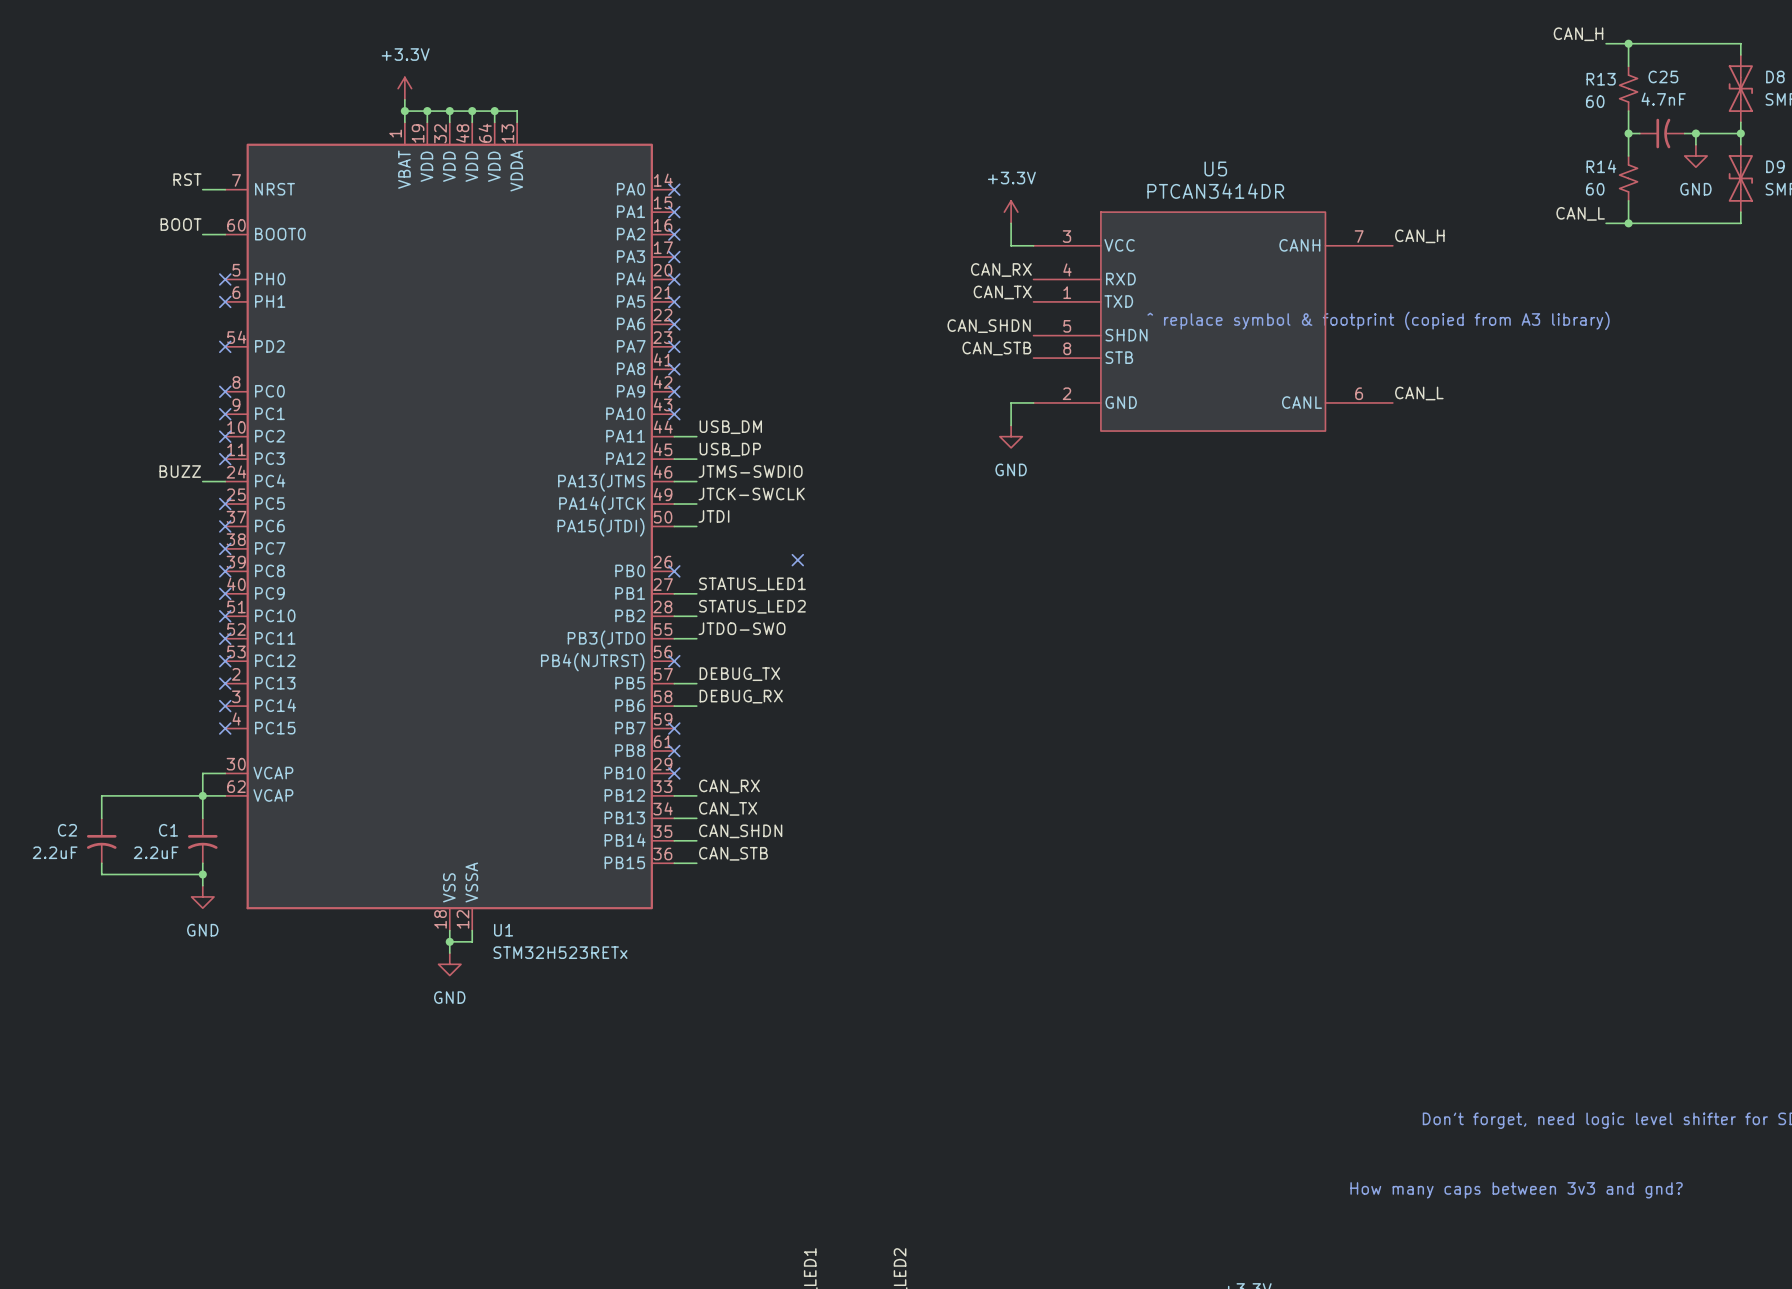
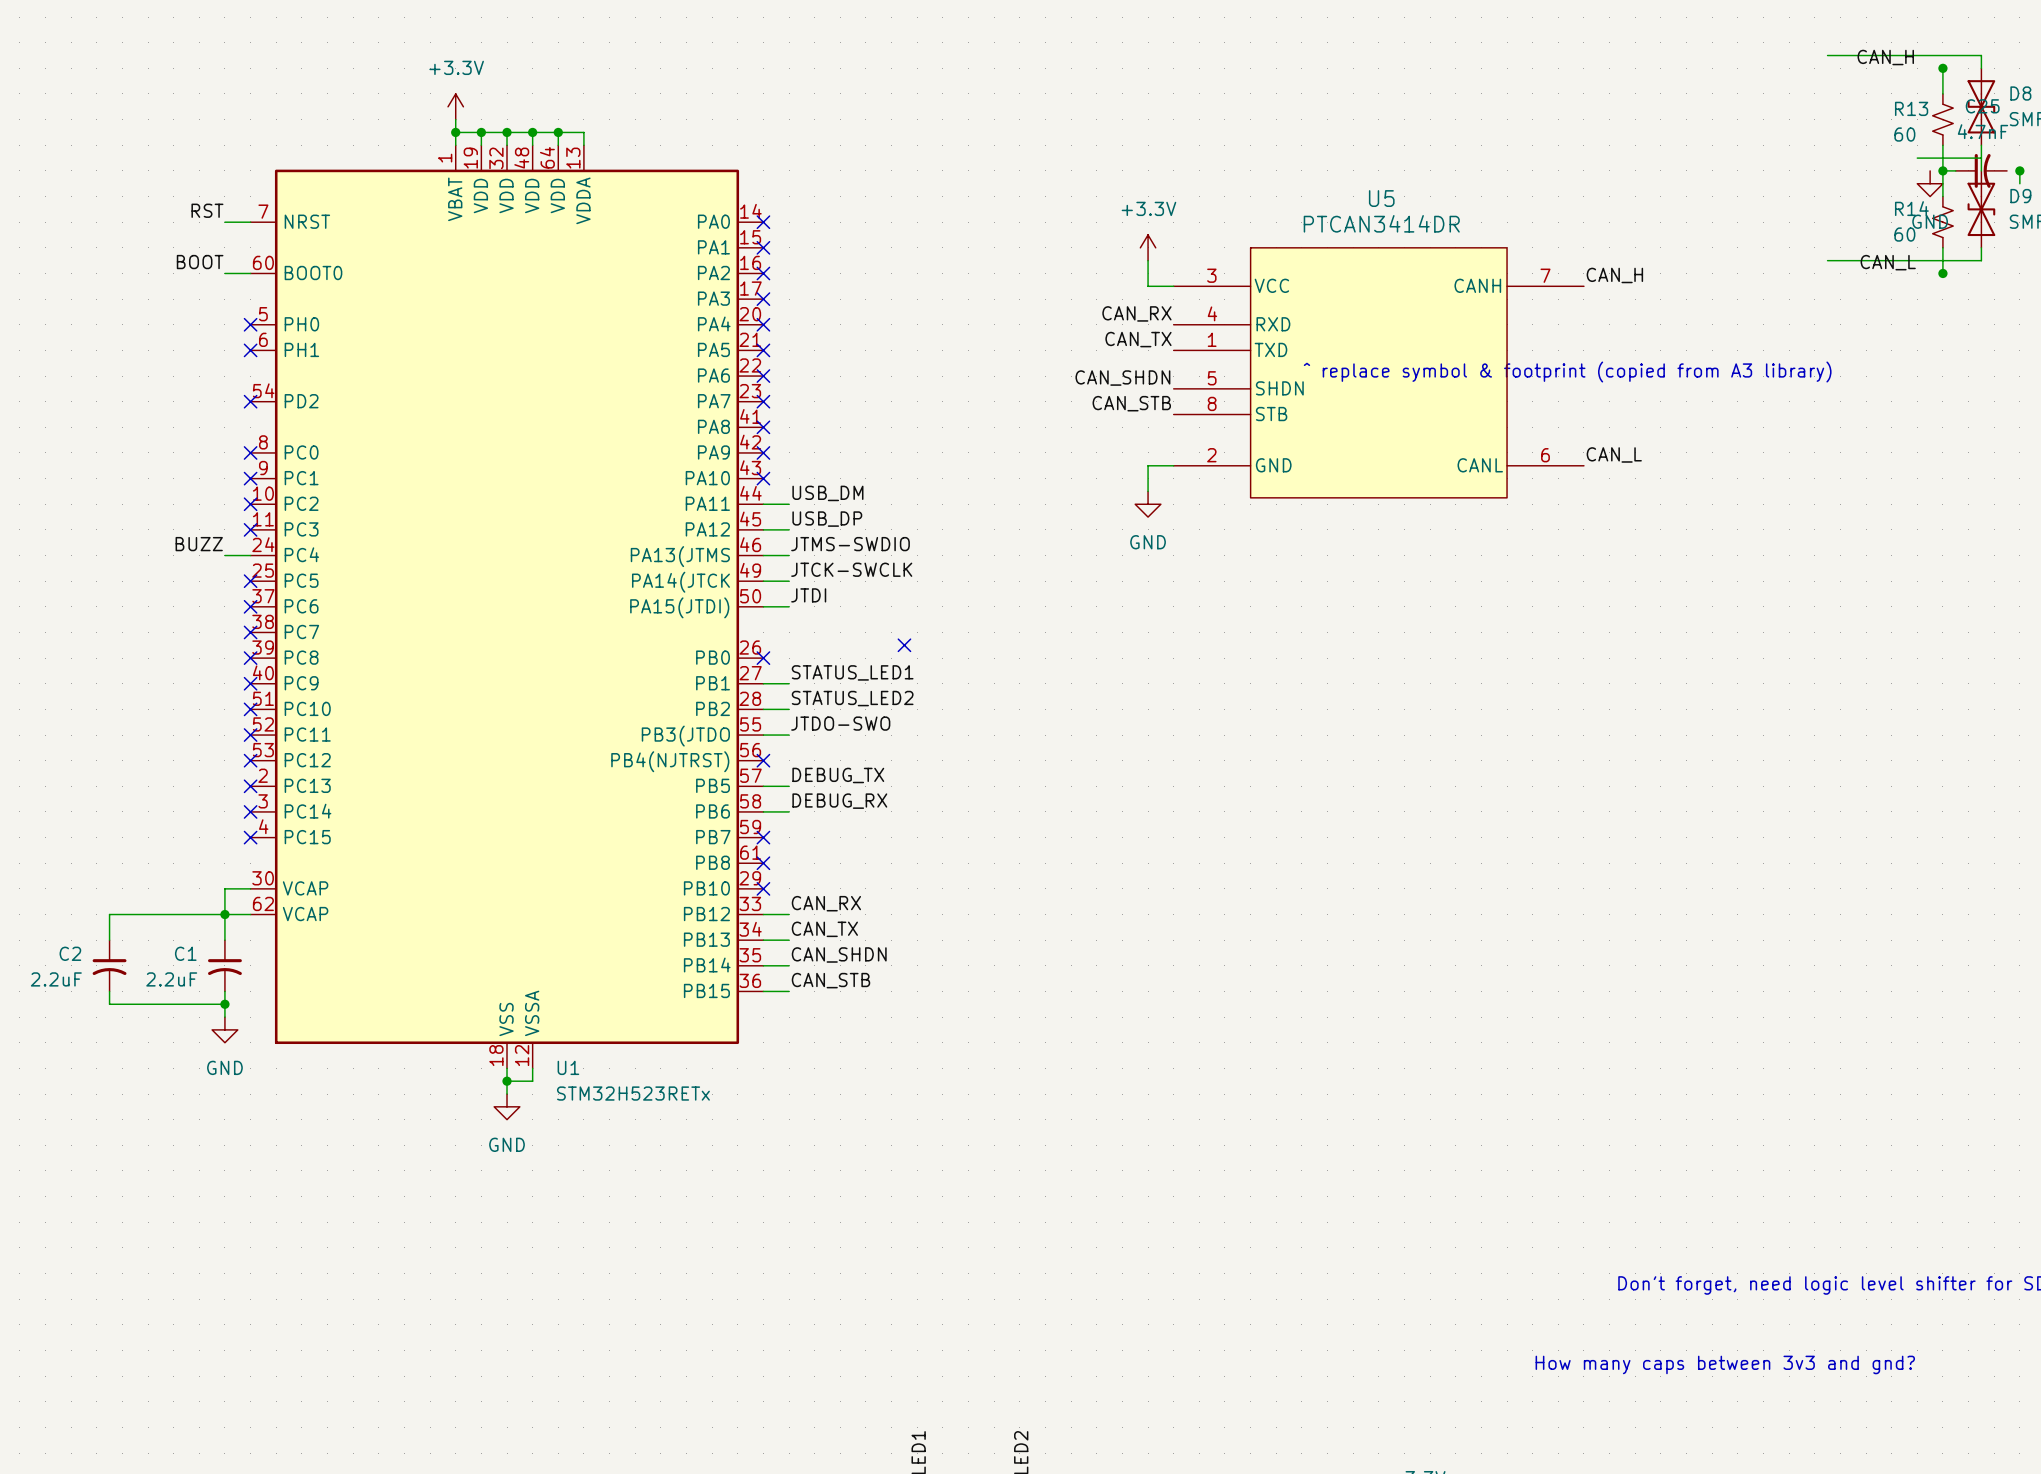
label position: CAN_H (1578, 34) -> CAN_H (1885, 57)
wire: (1628, 43) (1628, 66) -> (1942, 68) (1942, 93)
junction: (1628, 43) -> none
junction: none -> (1942, 68)
R13 position: (1628, 88) -> (1942, 119)
wire: (1628, 111) (1628, 155) -> (1942, 145) (1942, 196)
wire: (1628, 133) (1639, 133) -> (1942, 170) (1955, 170)
junction: (1628, 133) -> none
C25 position: (1662, 133) -> (1981, 170)
wire: (1695, 133) (1695, 144) -> (2019, 170) (2019, 183)
junction position: (1695, 133) -> (1942, 170)
junction: (1740, 133) -> none
junction: none -> (2019, 170)
R14 position: (1628, 178) -> (1942, 222)
wire: (1628, 200) (1628, 223) -> (1942, 247) (1942, 273)
label position: CAN_L (1580, 213) -> CAN_L (1888, 262)
junction: (1628, 223) -> none
junction: none -> (1942, 273)

